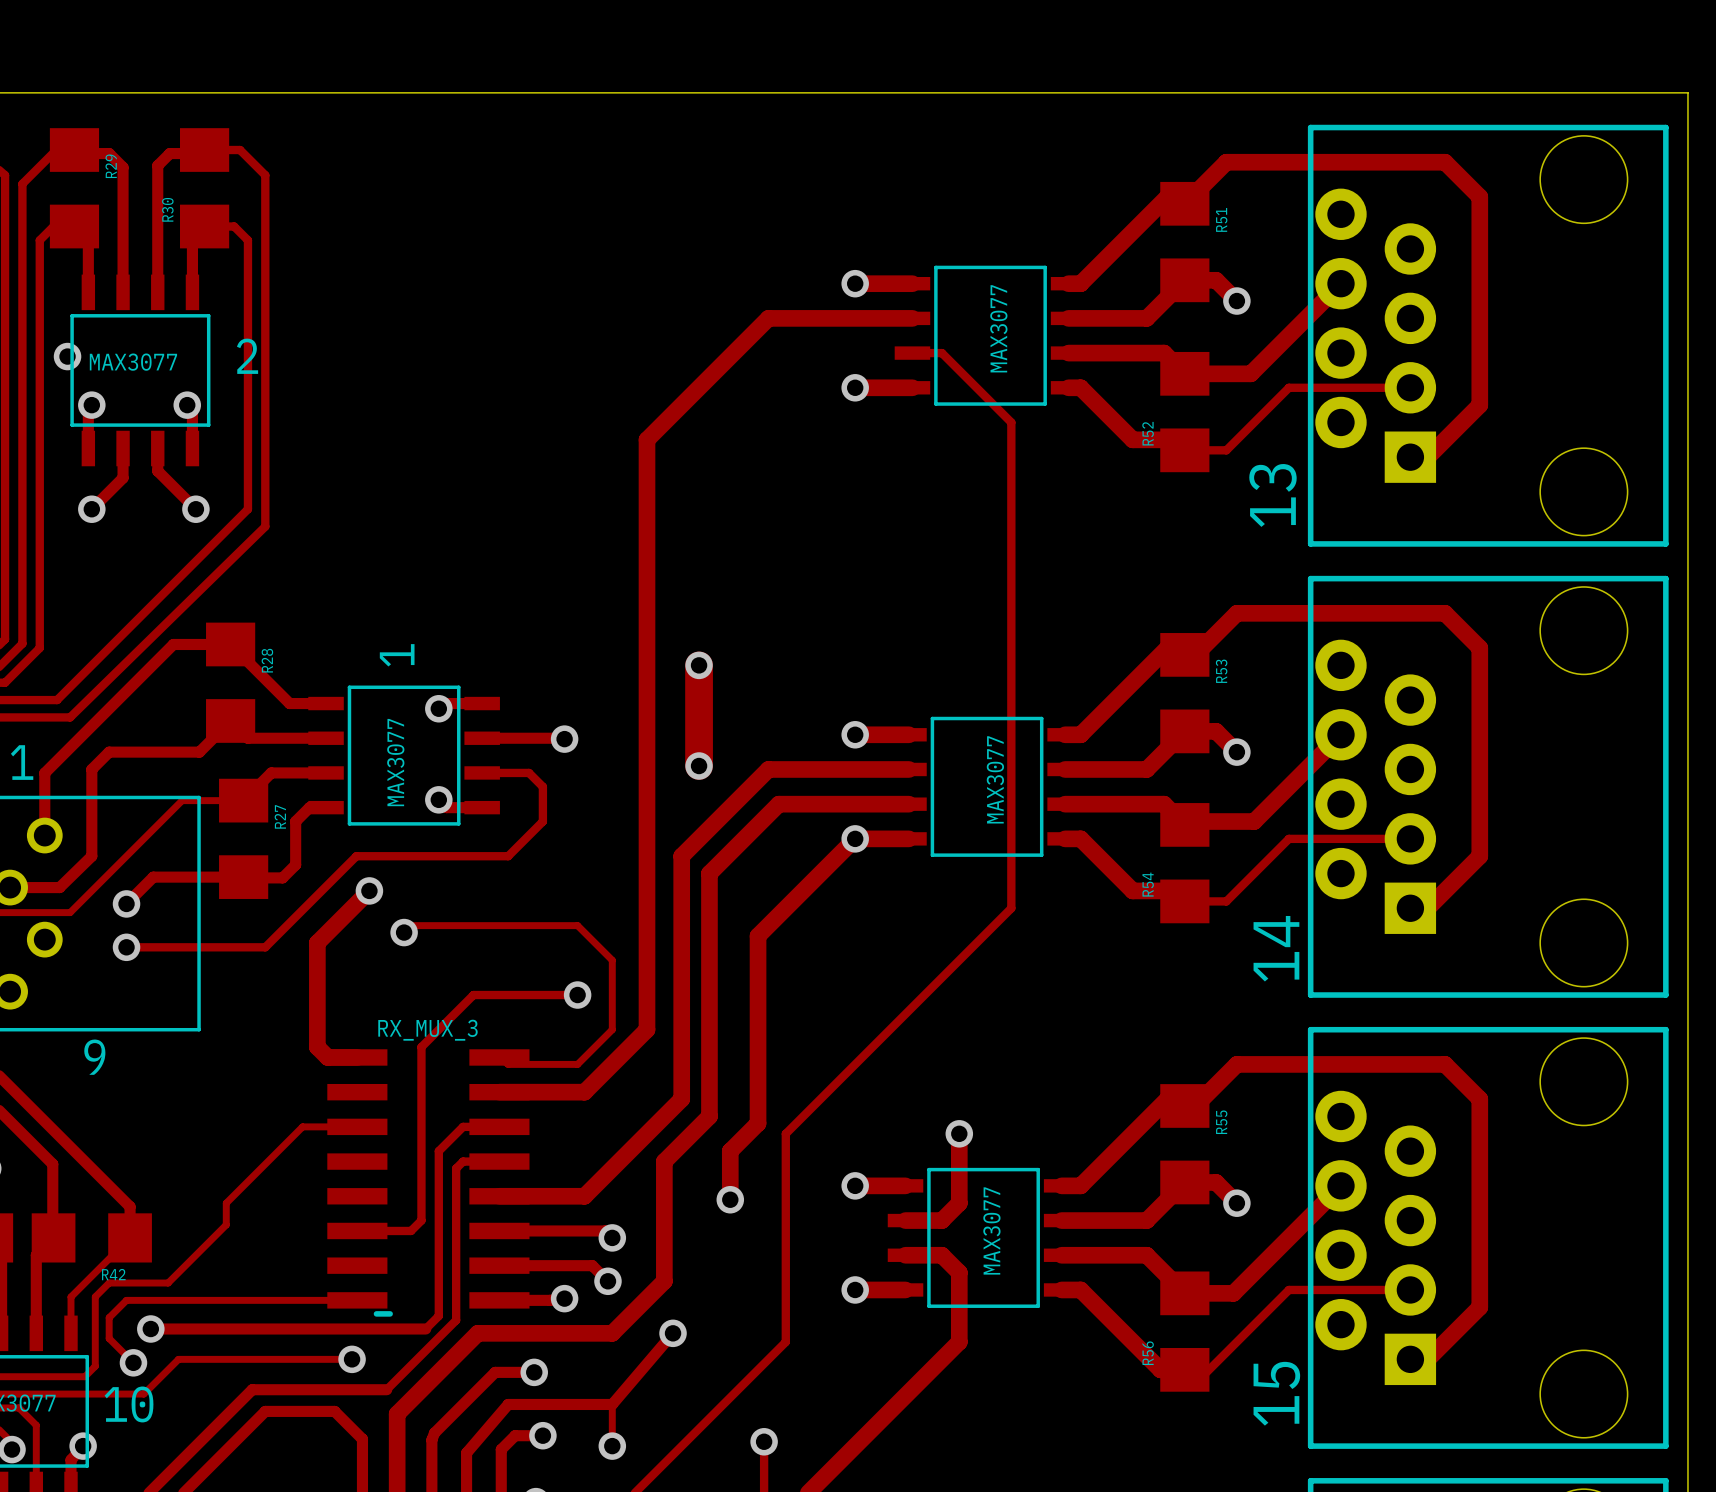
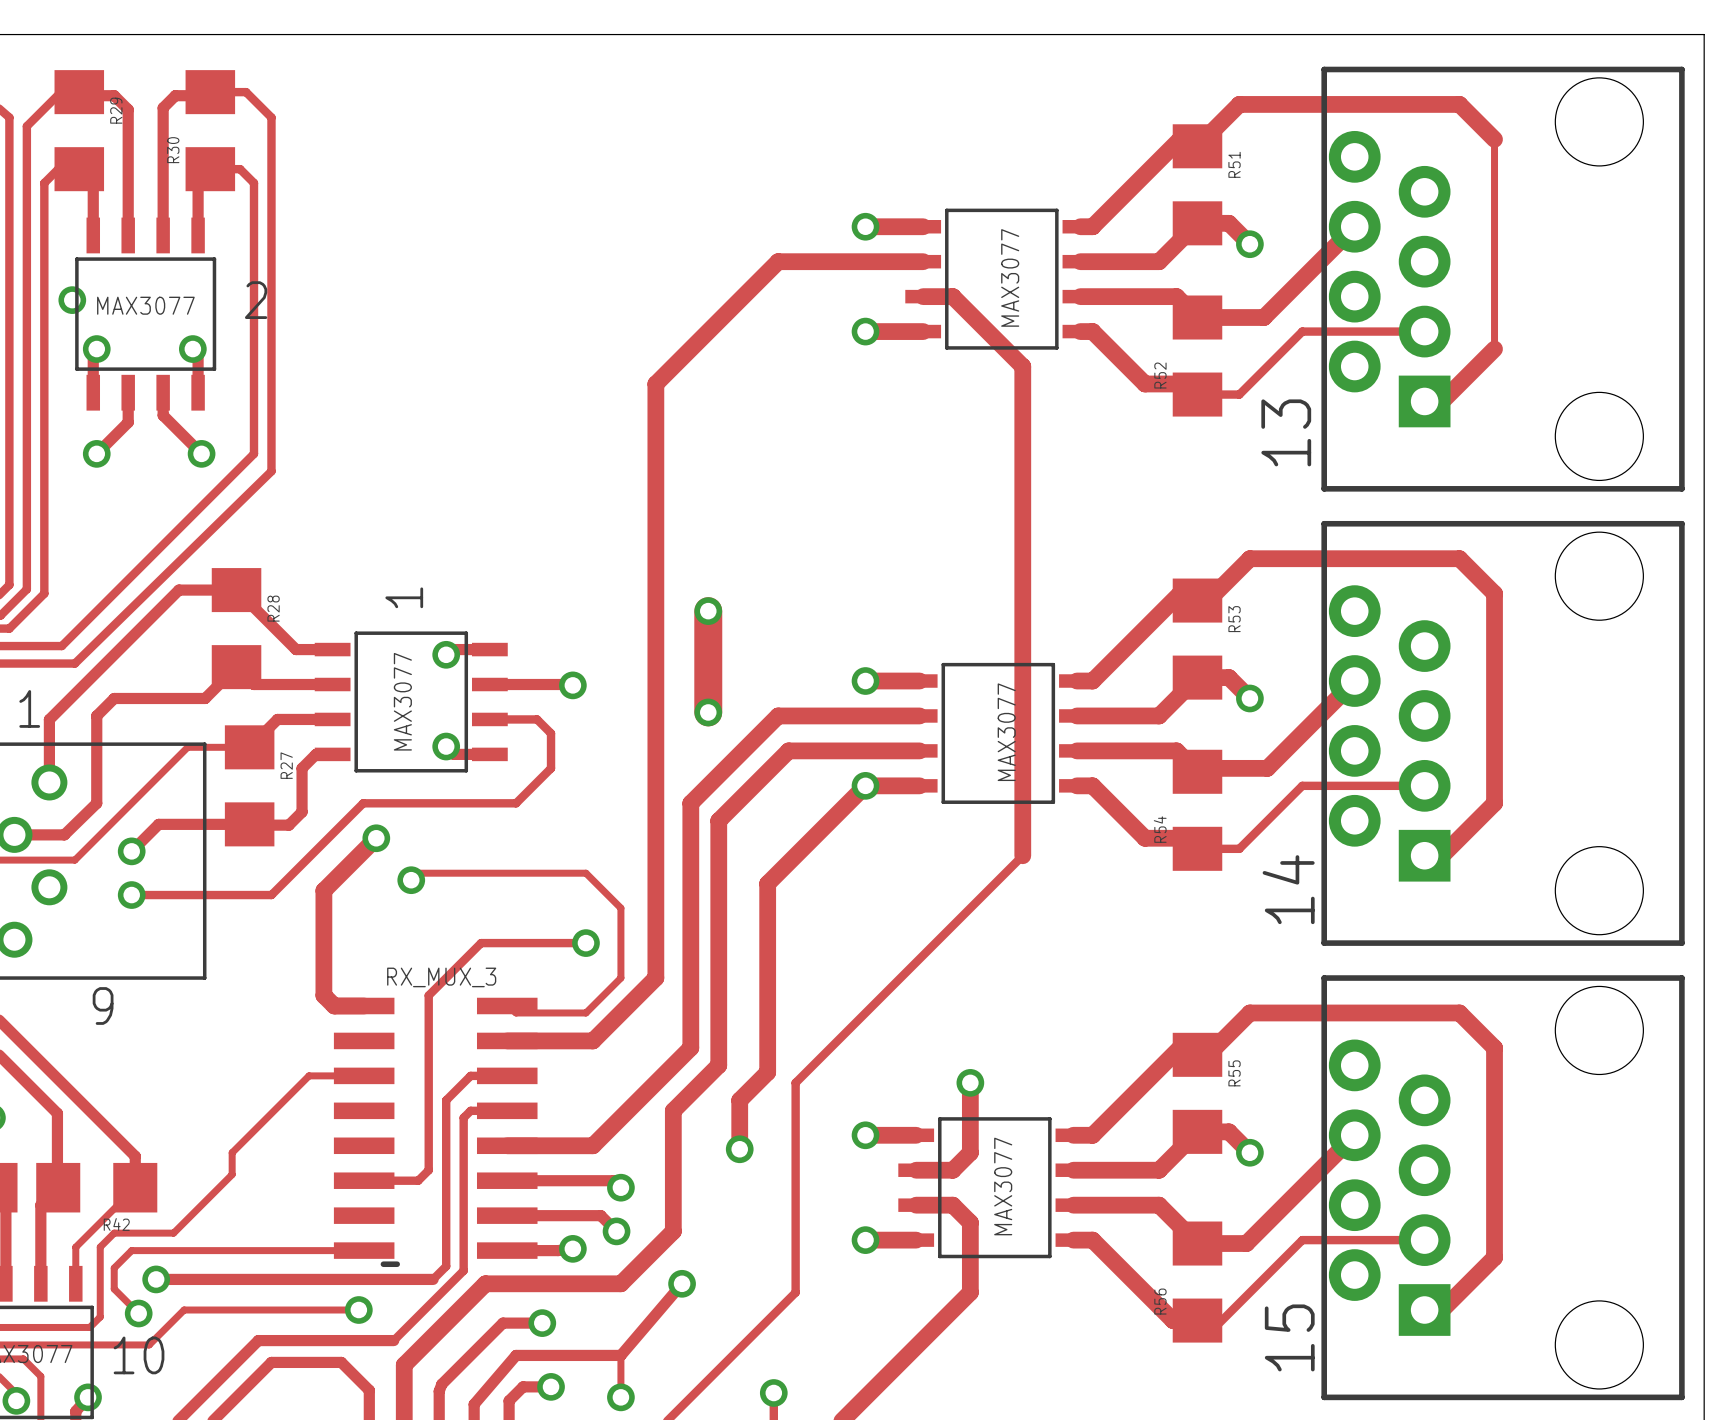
track width: thick (1479, 196) (1479, 405) -> thin (1494, 139) (1494, 349)
track width: thin (912, 353) (941, 353) (1011, 422) (1011, 908) -> thick (923, 296) (952, 296) (1022, 366) (1022, 855)

